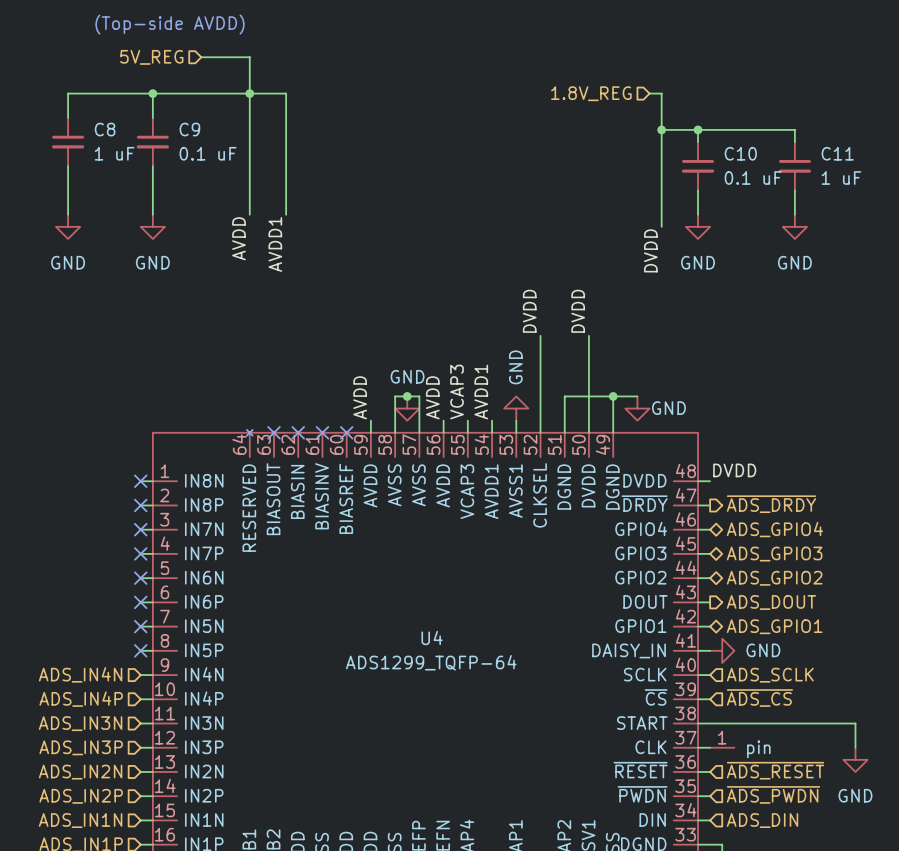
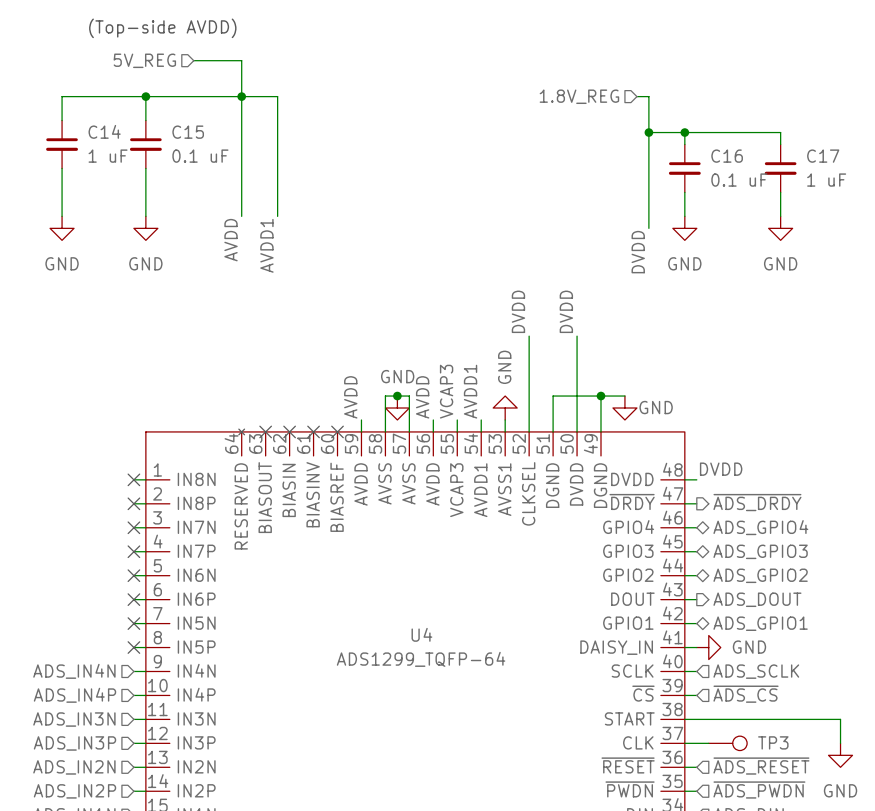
C8 name: C8 (105, 129) -> C14 (104, 131)
C9 name: C9 (189, 129) -> C15 (188, 132)
C10 name: C10 (740, 153) -> C16 (727, 156)
C11 name: C11 (837, 153) -> C17 (823, 156)
part: (722, 747) -> none
TP3: none -> (727, 743)

